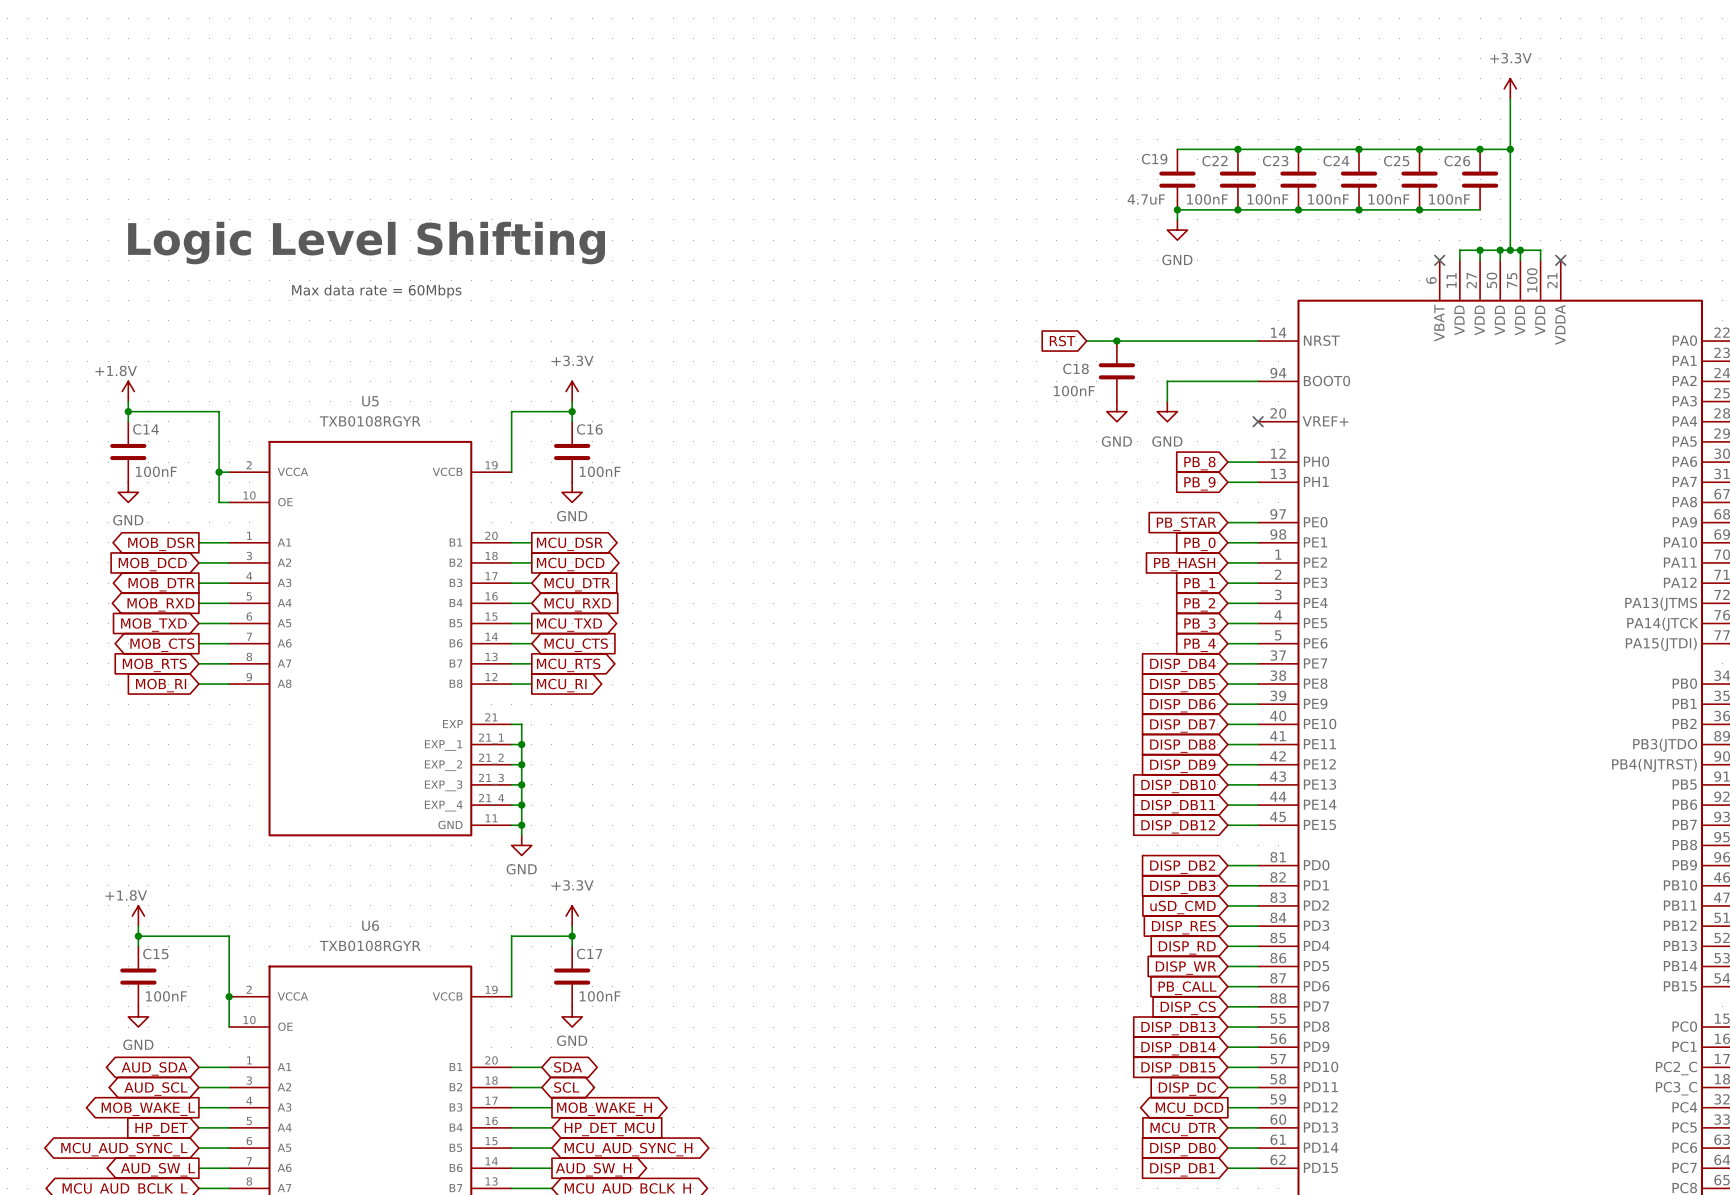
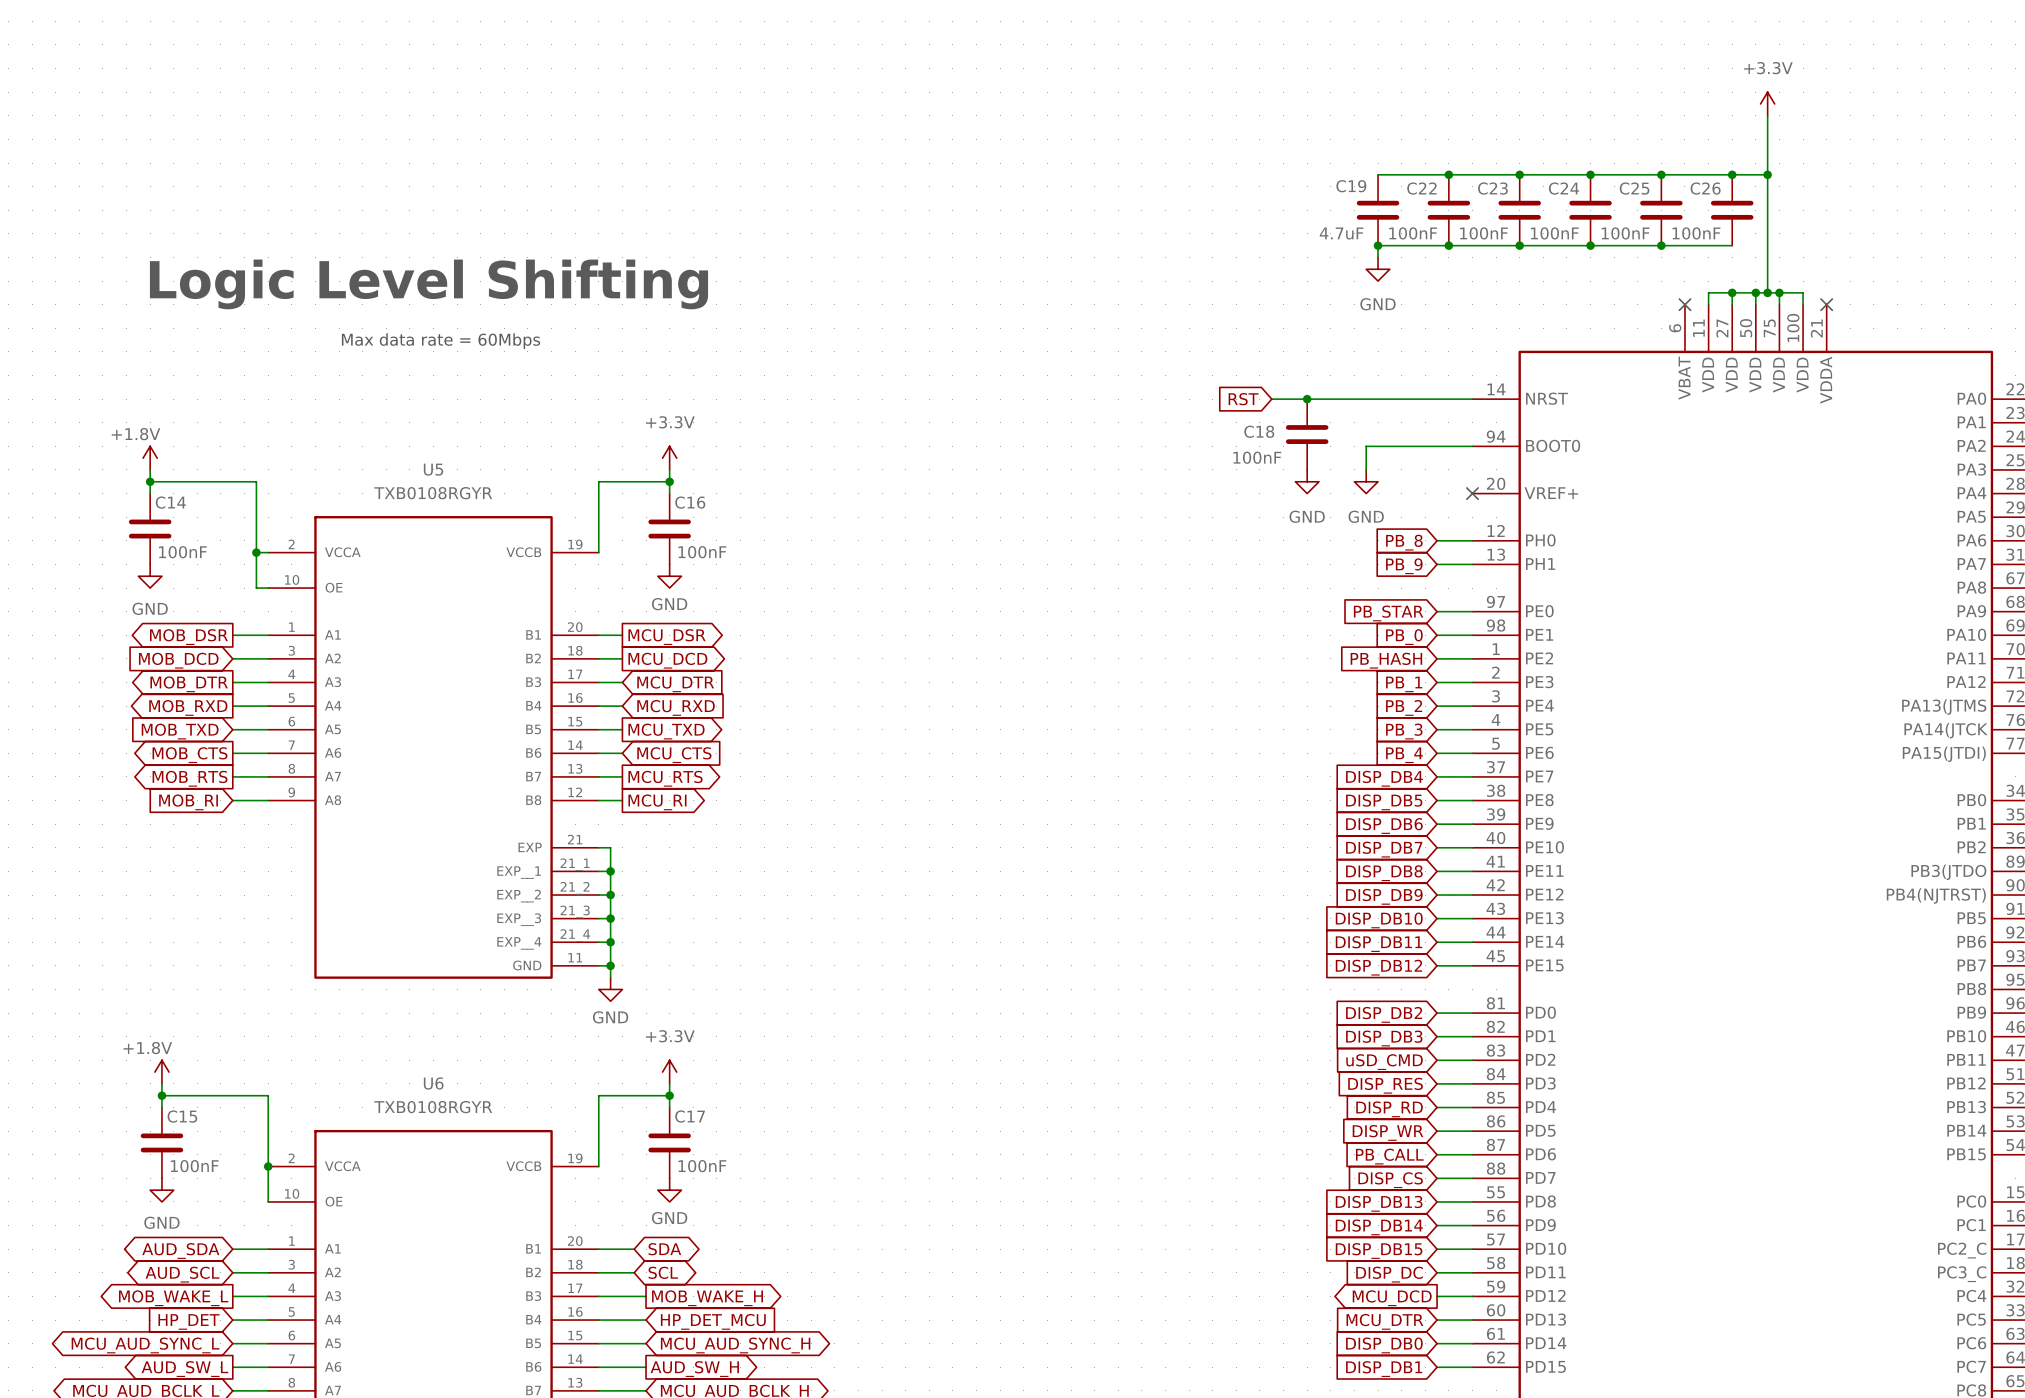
global label shape: input (154, 665) -> output (190, 778)

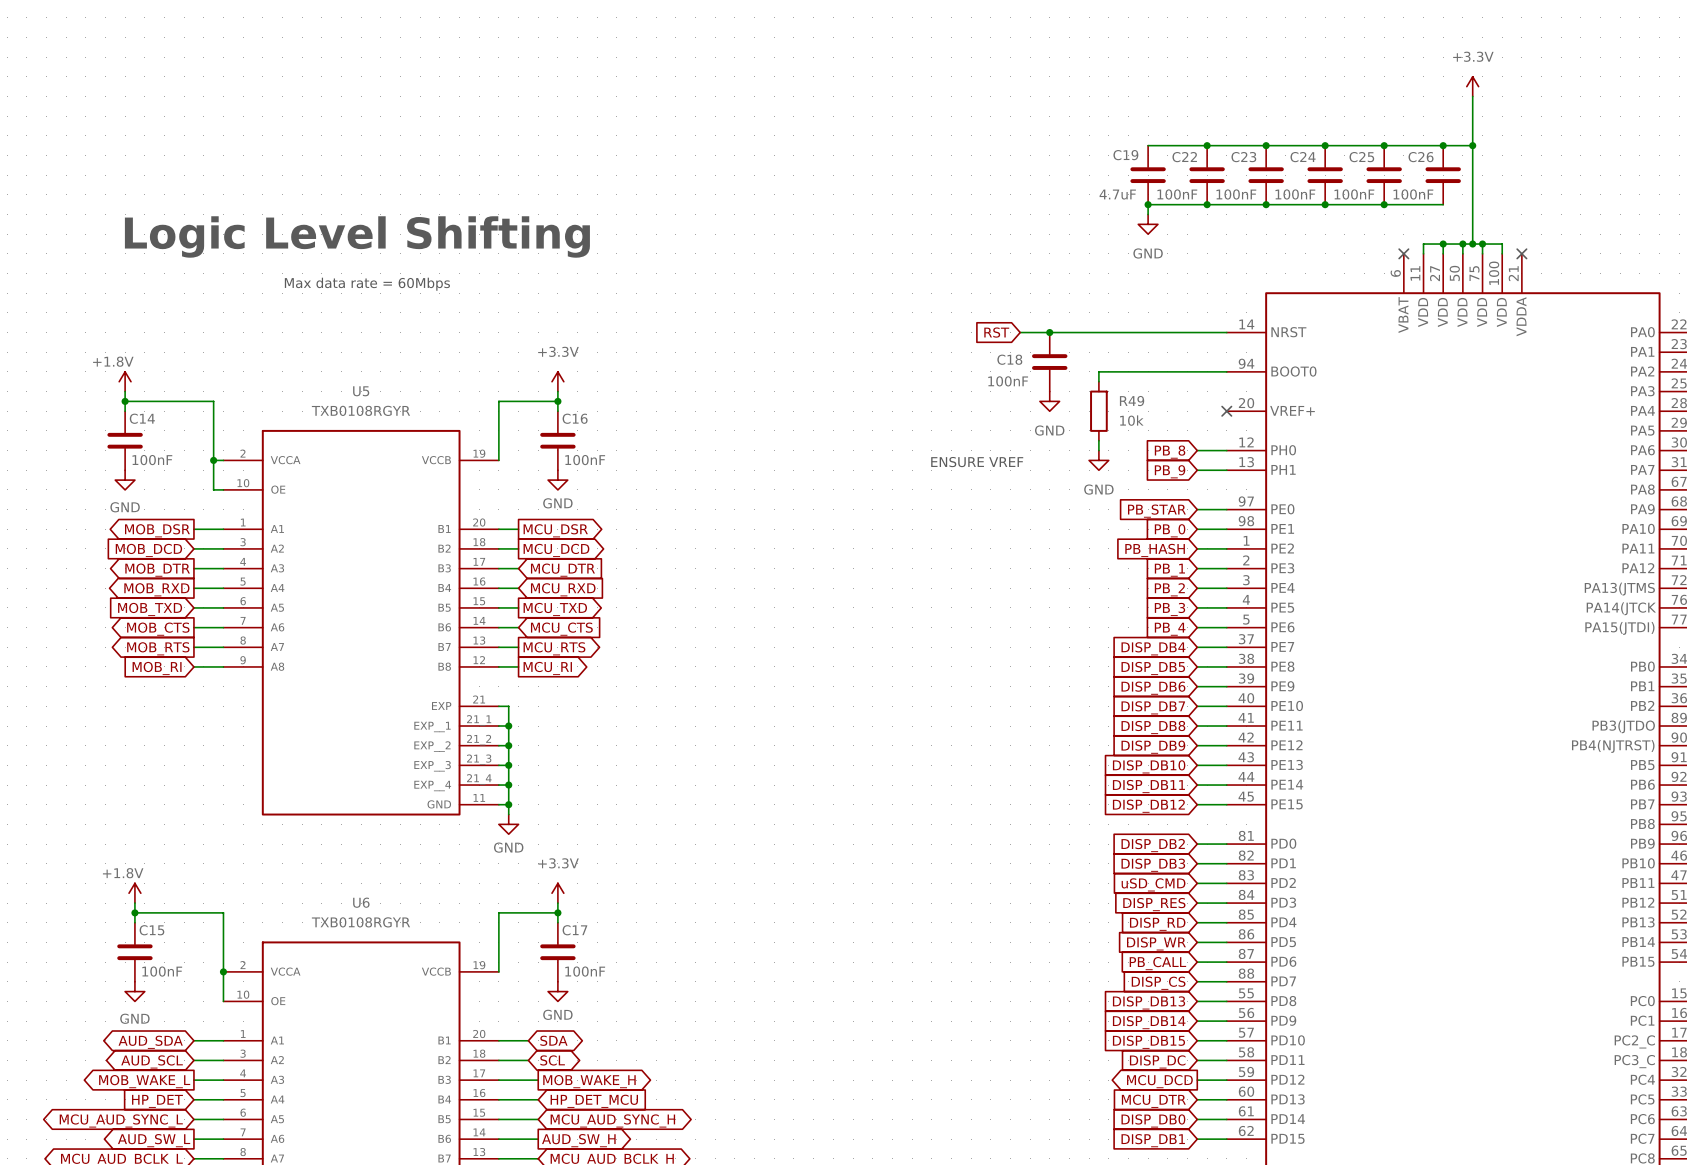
wire: none -> (1020, 332) (1059, 332)
global label position: RST (1243, 399) -> RST (996, 332)
junction position: (1307, 399) -> (1049, 332)
C18 position: (1307, 434) -> (1049, 362)
wire: (1366, 446) (1366, 469) -> (1138, 371) (1098, 371) (1098, 381)
power symbol: none -> GND (1049, 401)
power symbol: GND (1307, 481) -> none
power symbol: GND (1366, 481) -> none
R49: none -> 10k (1098, 411)
wire: none -> (1098, 440) (1098, 450)
power symbol: none -> GND (1098, 460)
text: none -> ENSURE VREF (977, 462)

